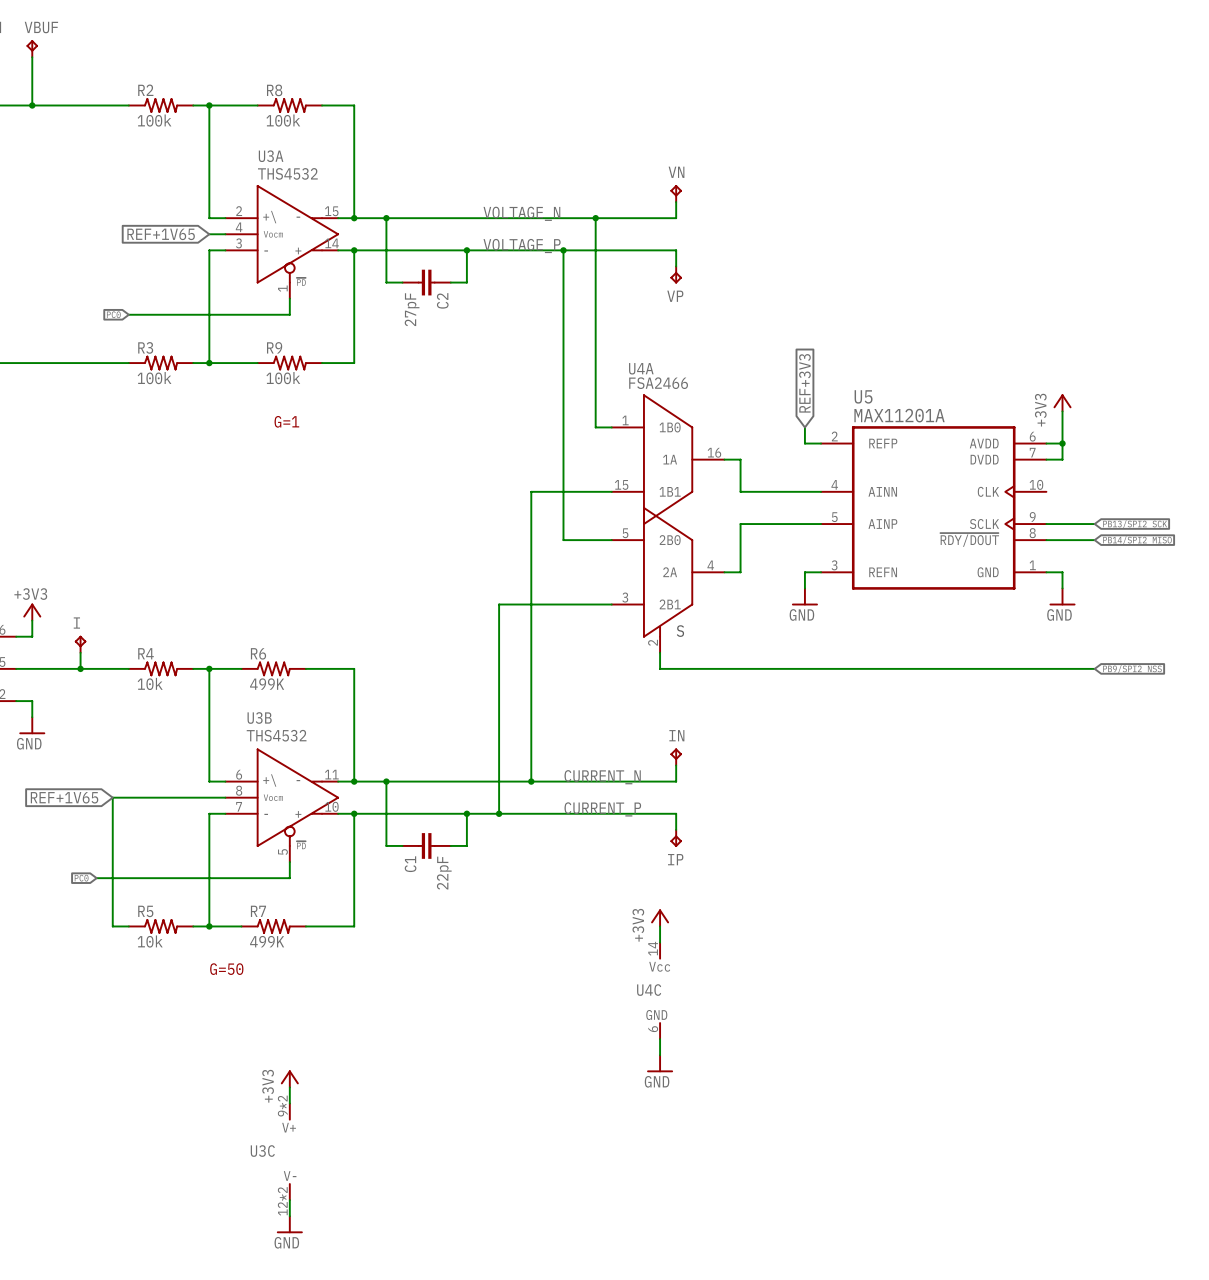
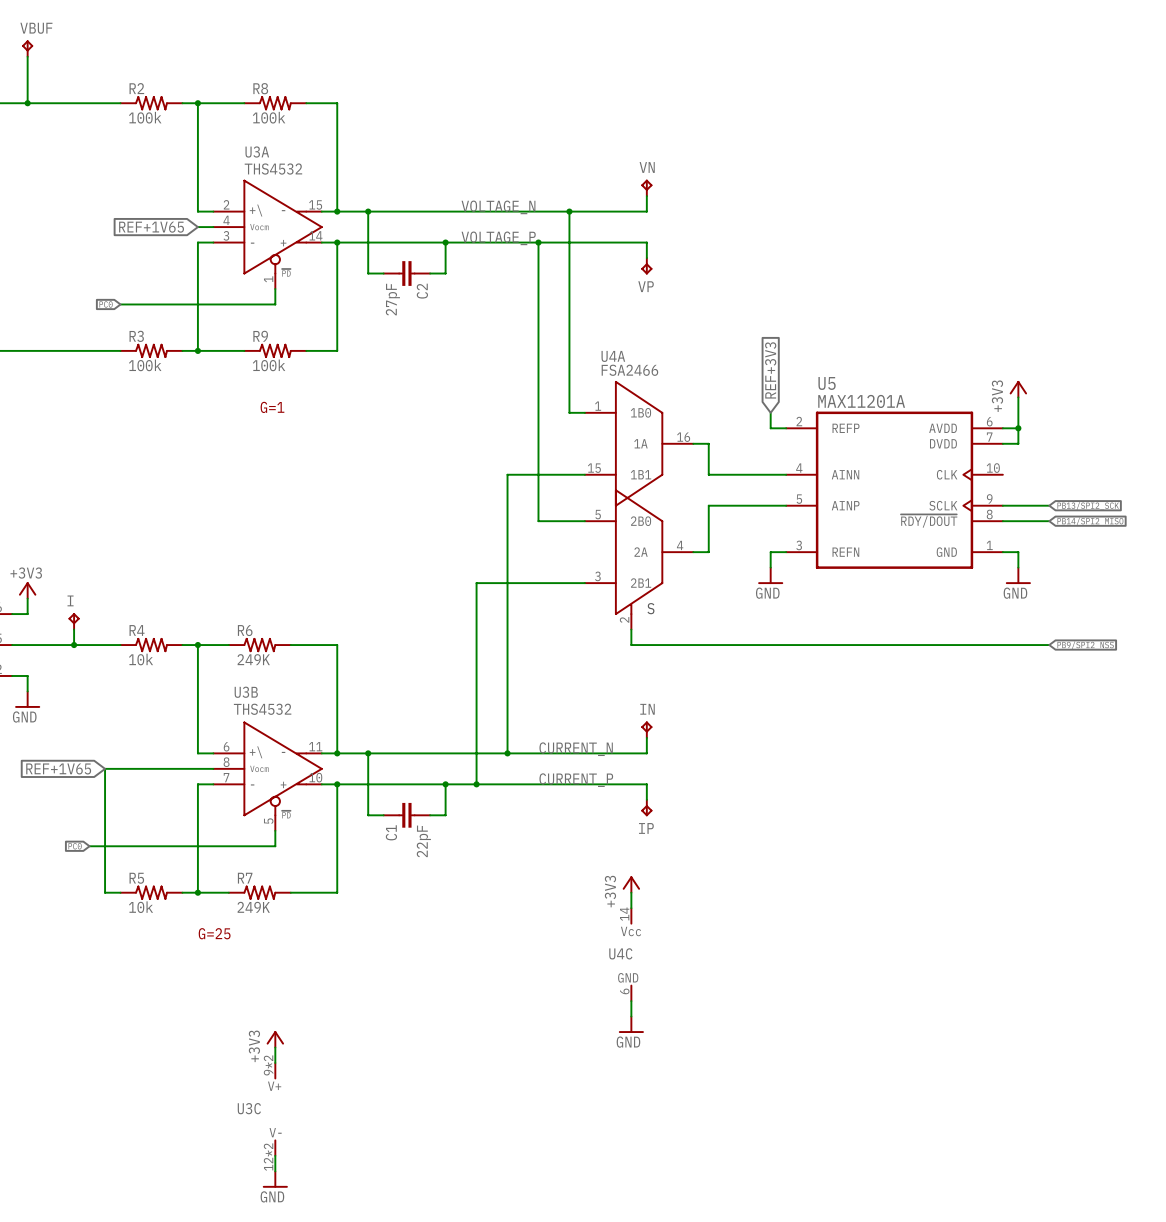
R6 value: 499K (267, 684) -> 249K (253, 659)
R7 value: 499K (267, 941) -> 249K (253, 907)
text: G=50 (226, 969) -> G=25 (214, 933)

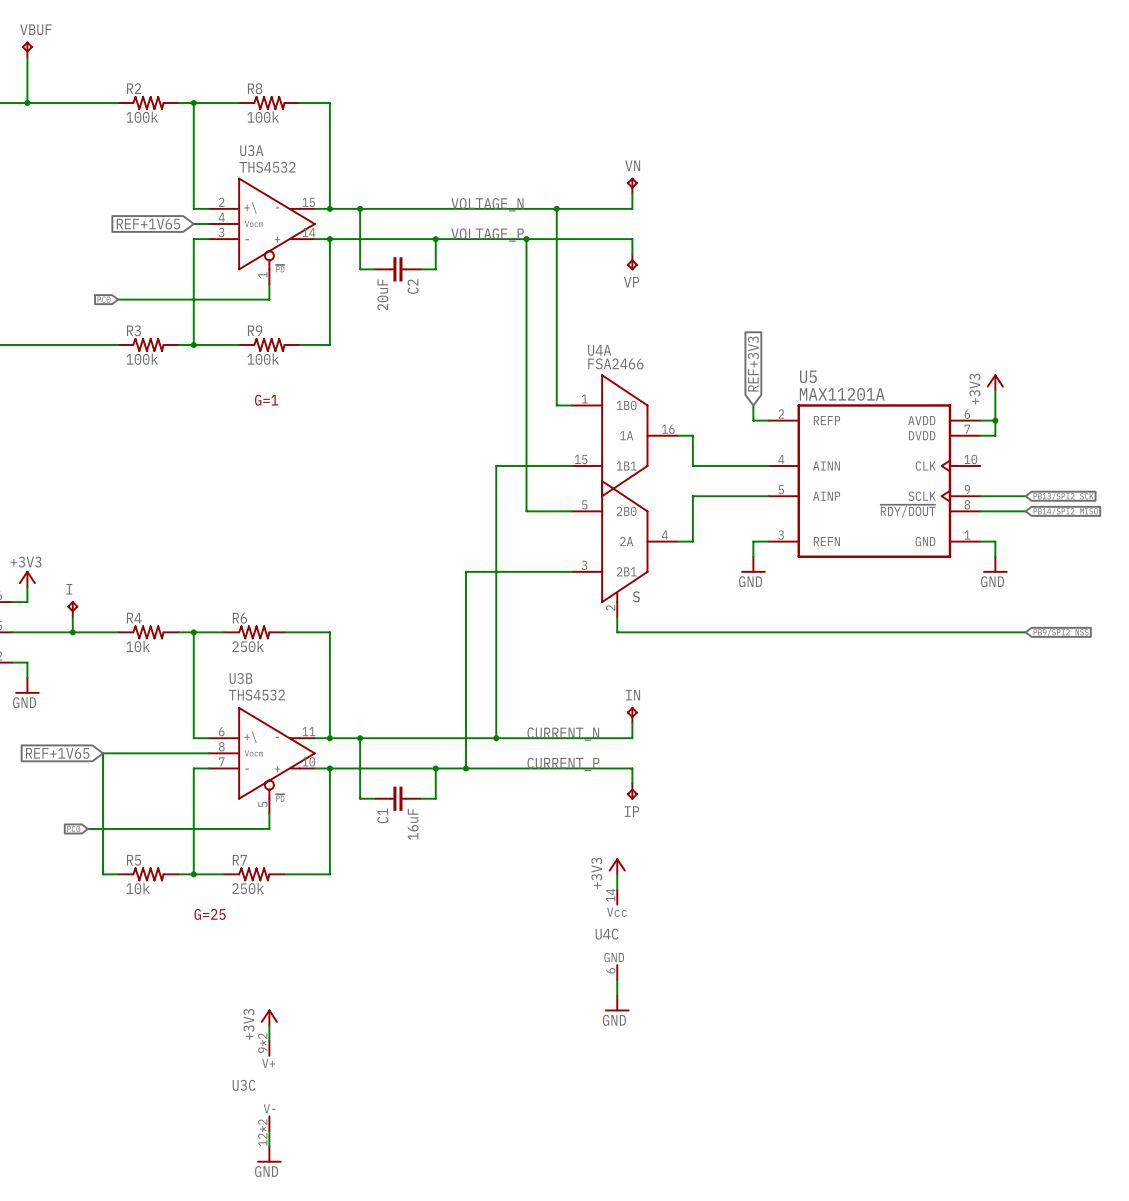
C2 value: 27pF (392, 299) -> 20uF (382, 294)
R6 value: 249K (253, 659) -> 250k (248, 646)
C1 value: 22pF (423, 841) -> 16uF (413, 824)
R7 value: 249K (253, 907) -> 250k (248, 888)

